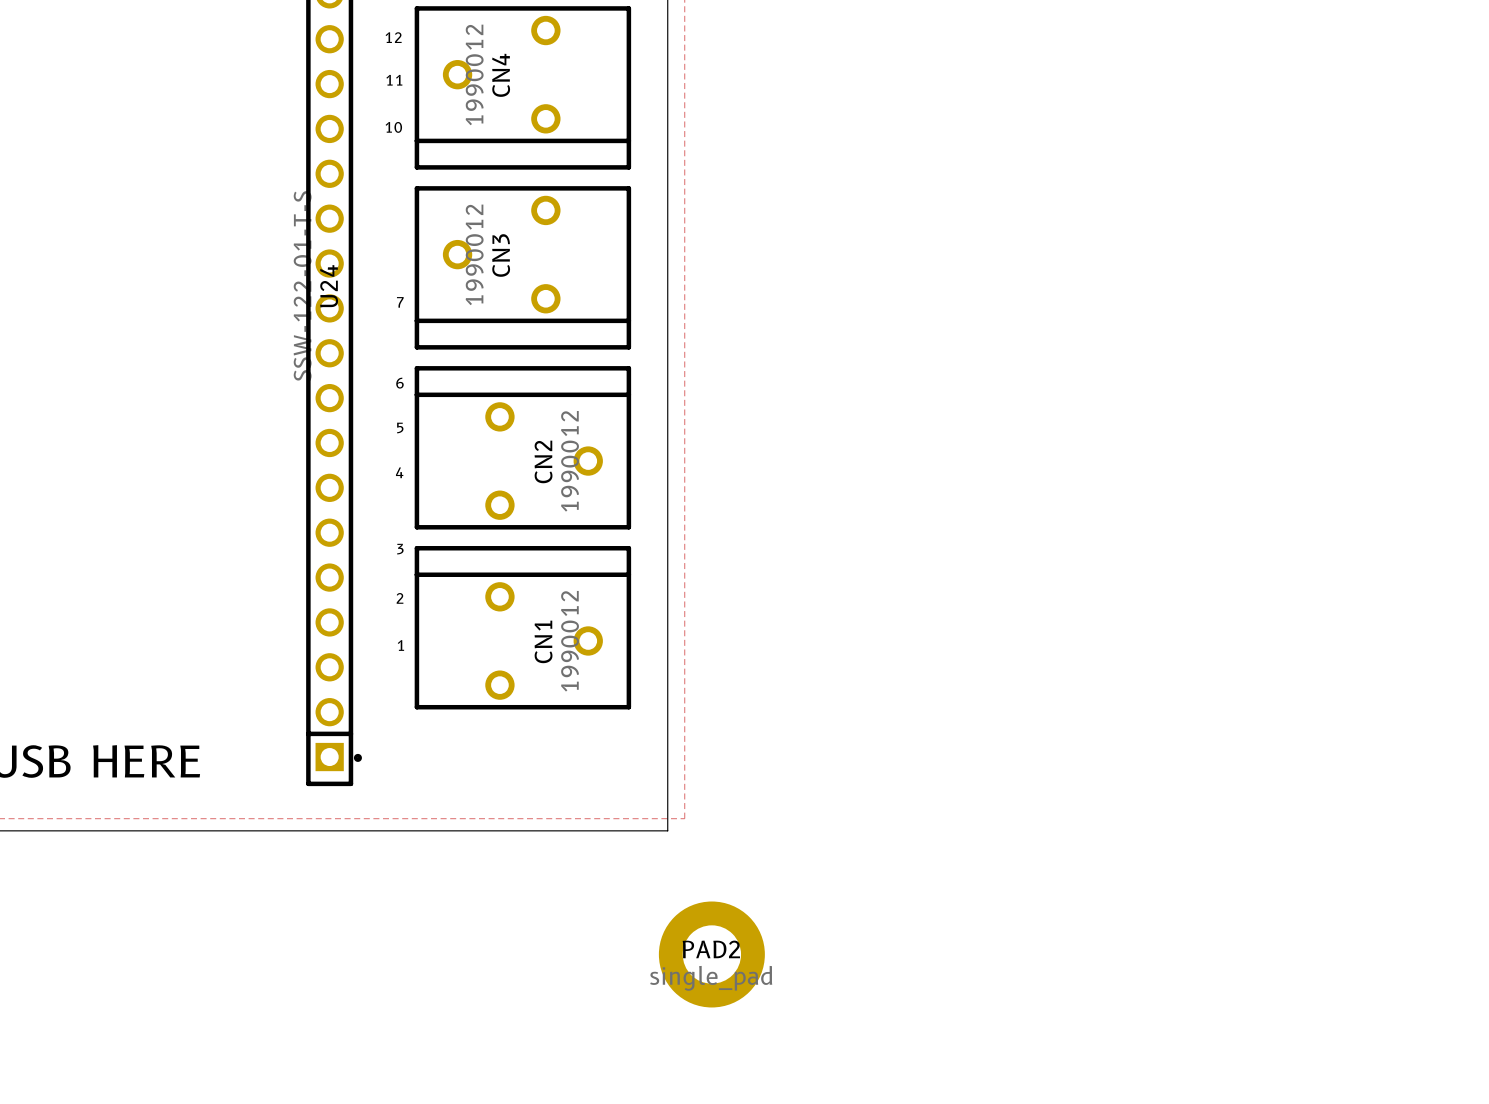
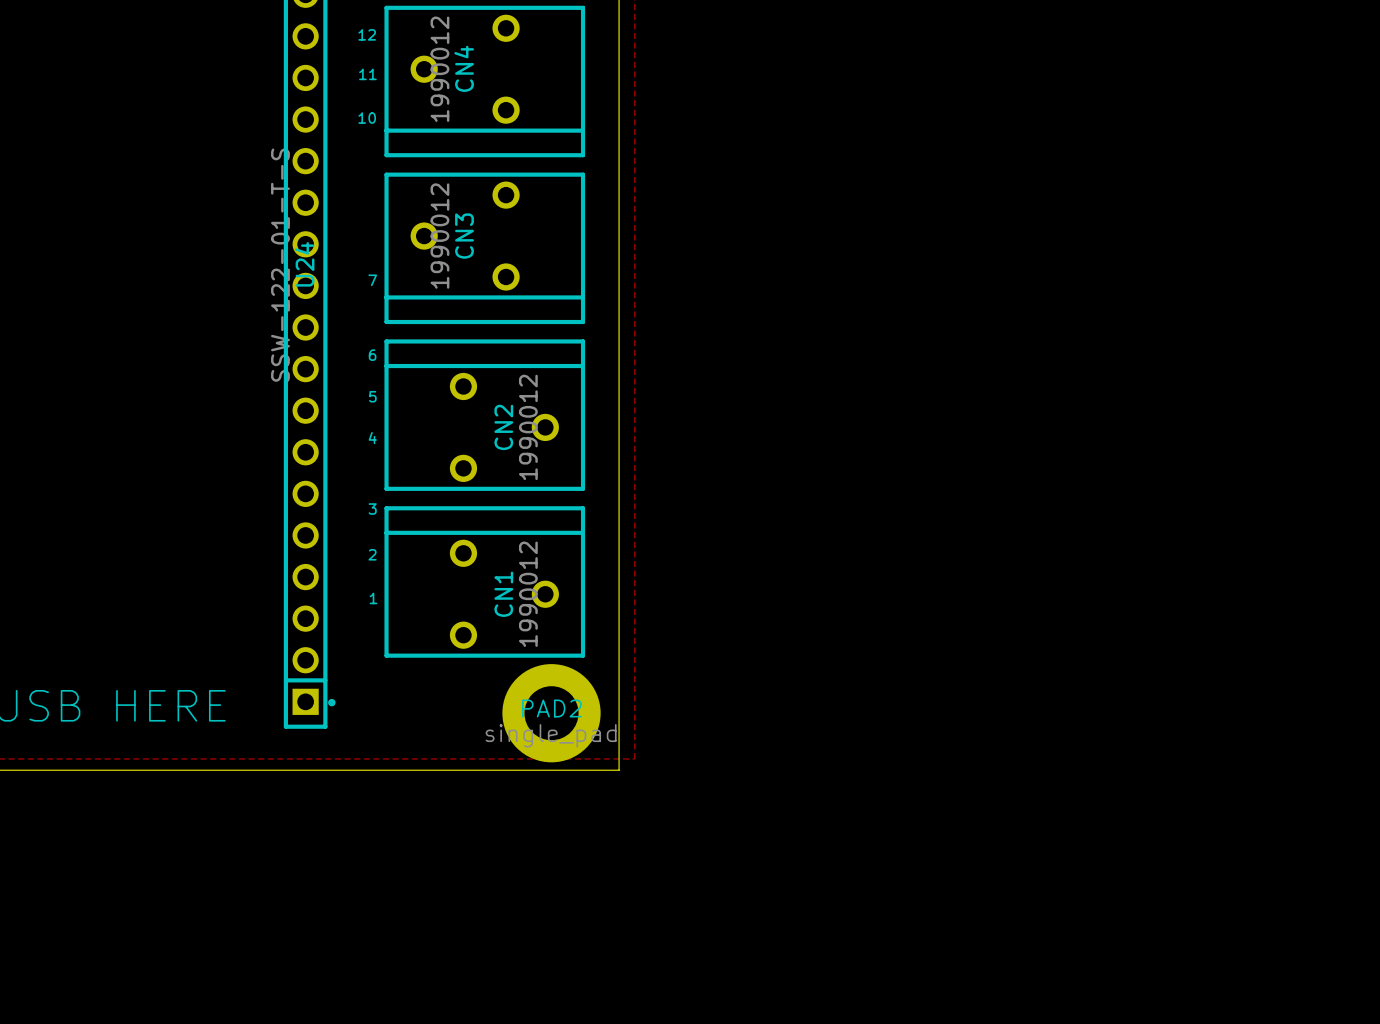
PAD2 position: (711, 954) -> (551, 713)

